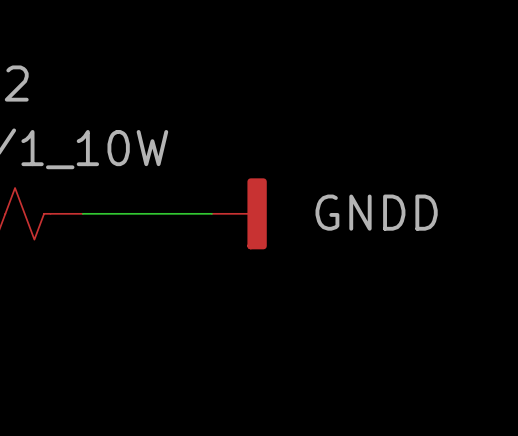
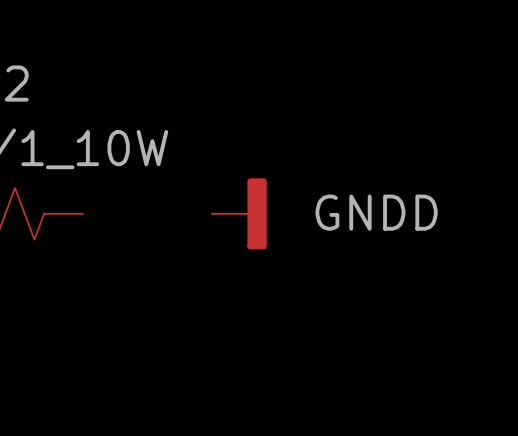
wire: (82, 213) (211, 213) -> none

